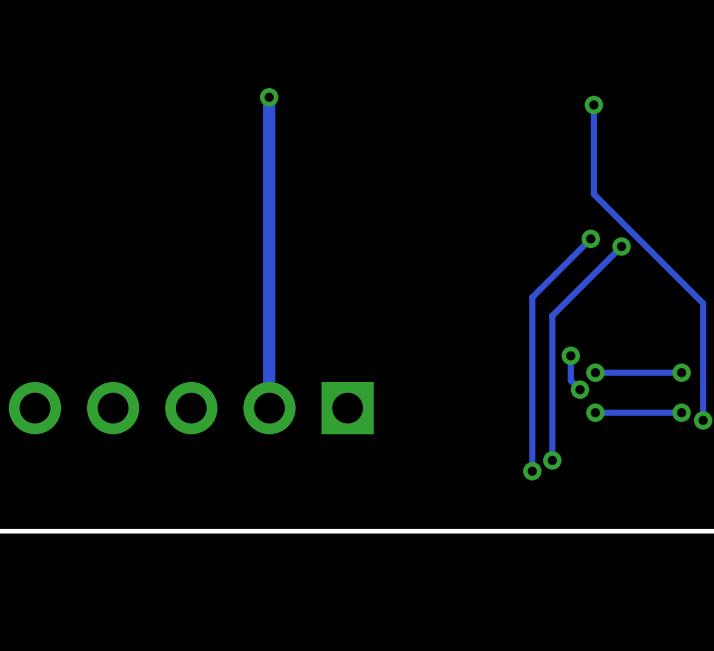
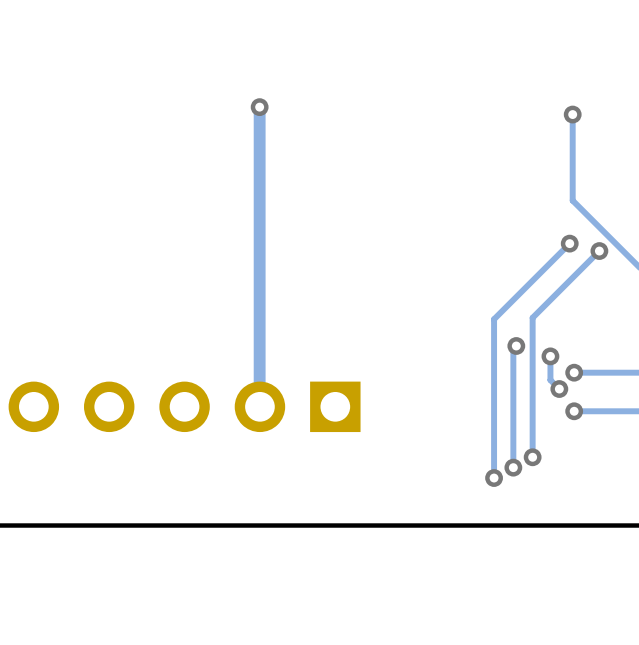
track: (532, 297) (532, 348) -> (513, 300) (494, 319) (494, 478)
via: none -> (516, 345)
via: none -> (494, 478)

